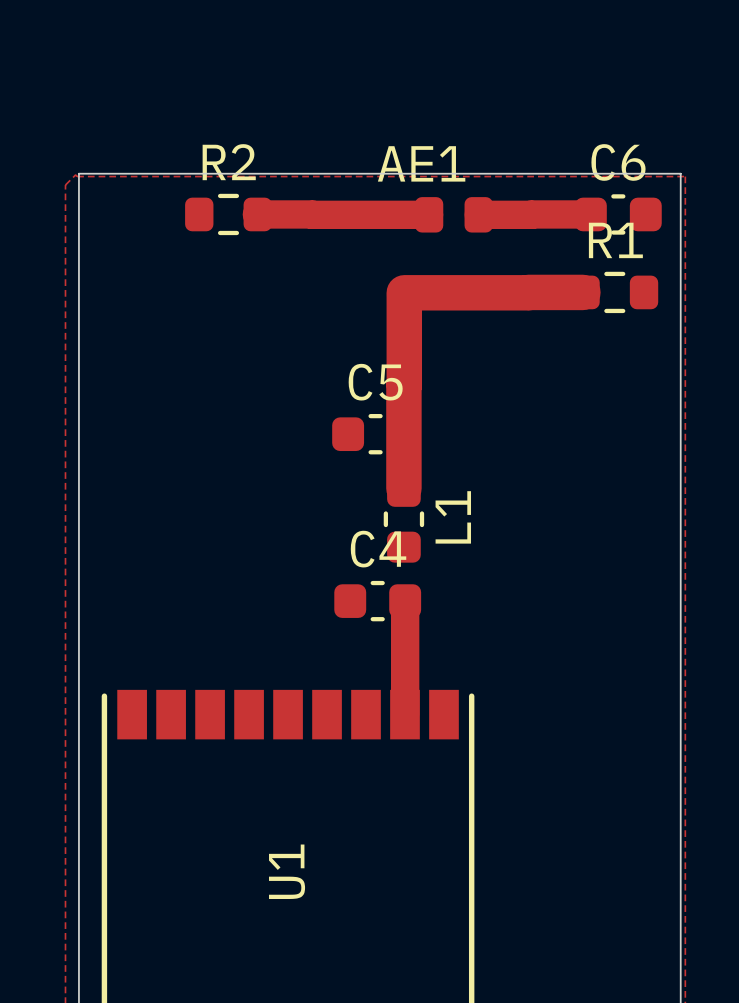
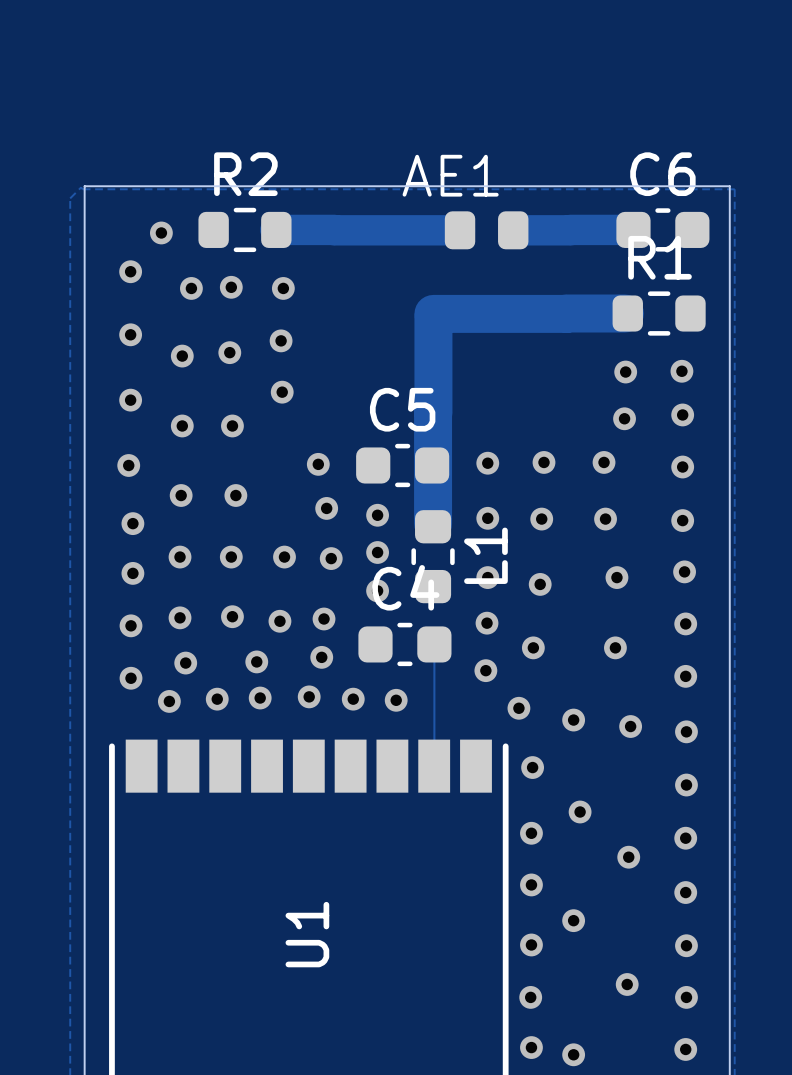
via: none -> (161, 232)
via: none -> (130, 271)
via: none -> (231, 287)
via: none -> (191, 288)
via: none -> (283, 288)
via: none -> (130, 334)
via: none -> (281, 340)
via: none -> (229, 352)
via: none -> (182, 356)
via: none -> (681, 371)
via: none -> (625, 372)
via: none -> (282, 392)
via: none -> (130, 400)
via: none -> (682, 414)
via: none -> (624, 418)
via: none -> (182, 425)
via: none -> (232, 425)
via: none -> (544, 462)
via: none -> (604, 462)
via: none -> (487, 463)
via: none -> (318, 464)
via: none -> (128, 465)
via: none -> (682, 467)
via: none -> (181, 495)
via: none -> (235, 495)
via: none -> (326, 508)
via: none -> (377, 515)
via: none -> (487, 518)
via: none -> (541, 519)
via: none -> (605, 519)
via: none -> (682, 520)
via: none -> (132, 523)
via: none -> (377, 552)
via: none -> (180, 557)
via: none -> (231, 557)
via: none -> (284, 557)
via: none -> (331, 558)
via: none -> (684, 571)
via: none -> (132, 573)
via: none -> (487, 577)
via: none -> (616, 577)
via: none -> (540, 584)
via: none -> (377, 590)
via: none -> (232, 616)
via: none -> (180, 617)
via: none -> (324, 618)
via: none -> (279, 621)
via: none -> (487, 623)
via: none -> (685, 623)
via: none -> (131, 625)
track width: thick (405, 601) (405, 714) -> thin (434, 644) (434, 765)
via: none -> (533, 647)
via: none -> (615, 647)
via: none -> (321, 657)
via: none -> (256, 661)
via: none -> (185, 663)
via: none -> (485, 670)
via: none -> (685, 676)
via: none -> (131, 678)
via: none -> (309, 696)
via: none -> (260, 698)
via: none -> (217, 699)
via: none -> (353, 699)
via: none -> (396, 700)
via: none -> (169, 701)
via: none -> (518, 708)
via: none -> (573, 720)
via: none -> (630, 726)
via: none -> (686, 731)
via: none -> (532, 767)
via: none -> (686, 785)
via: none -> (580, 812)
via: none -> (531, 833)
via: none -> (685, 838)
via: none -> (628, 857)
via: none -> (531, 884)
via: none -> (685, 892)
via: none -> (573, 920)
via: none -> (531, 944)
via: none -> (686, 945)
via: none -> (627, 984)
via: none -> (530, 997)
via: none -> (686, 997)
via: none -> (531, 1047)
via: none -> (685, 1049)
via: none -> (573, 1054)

